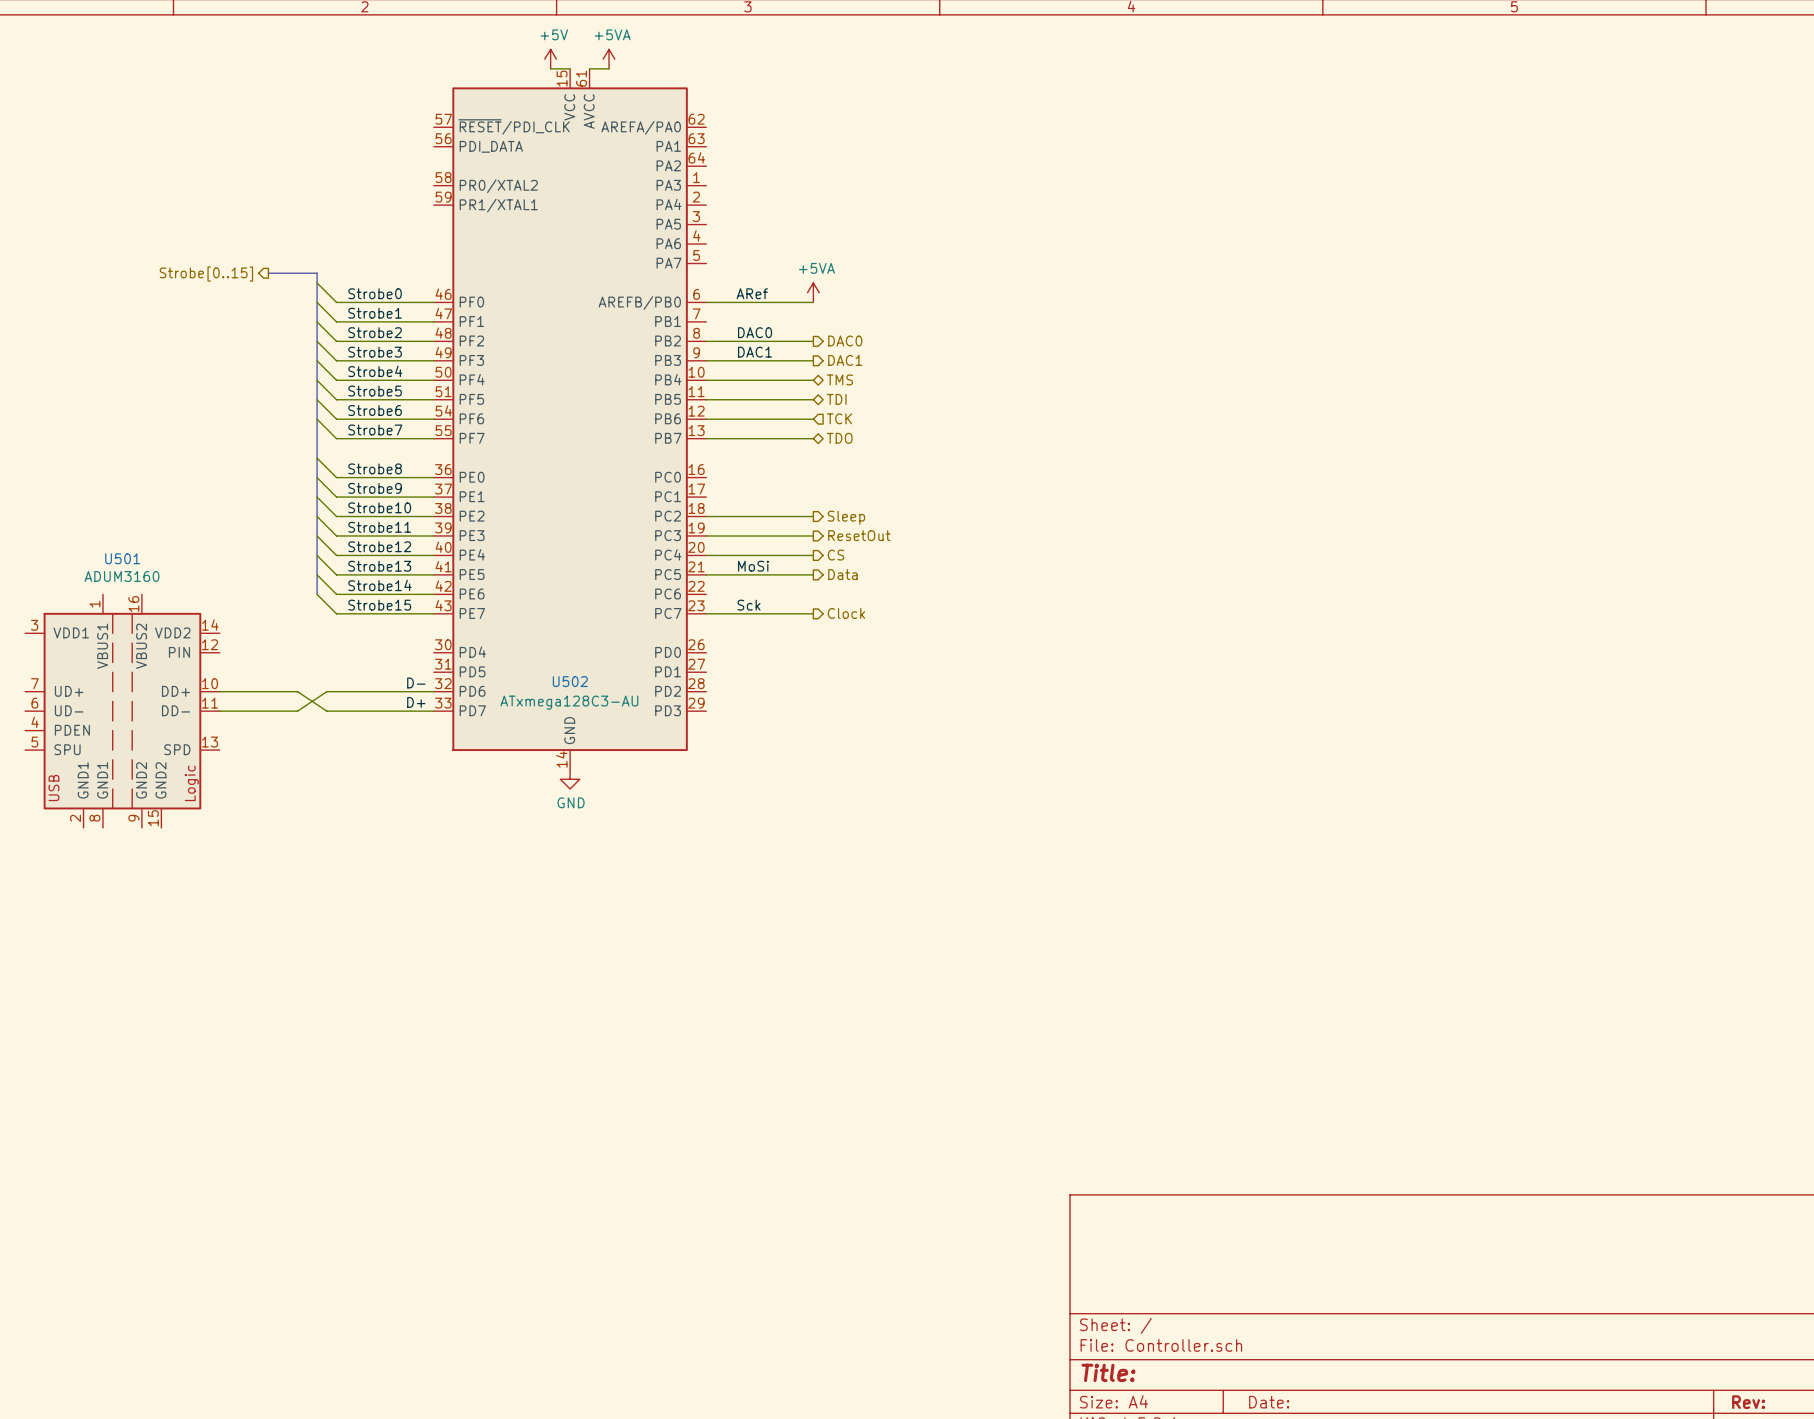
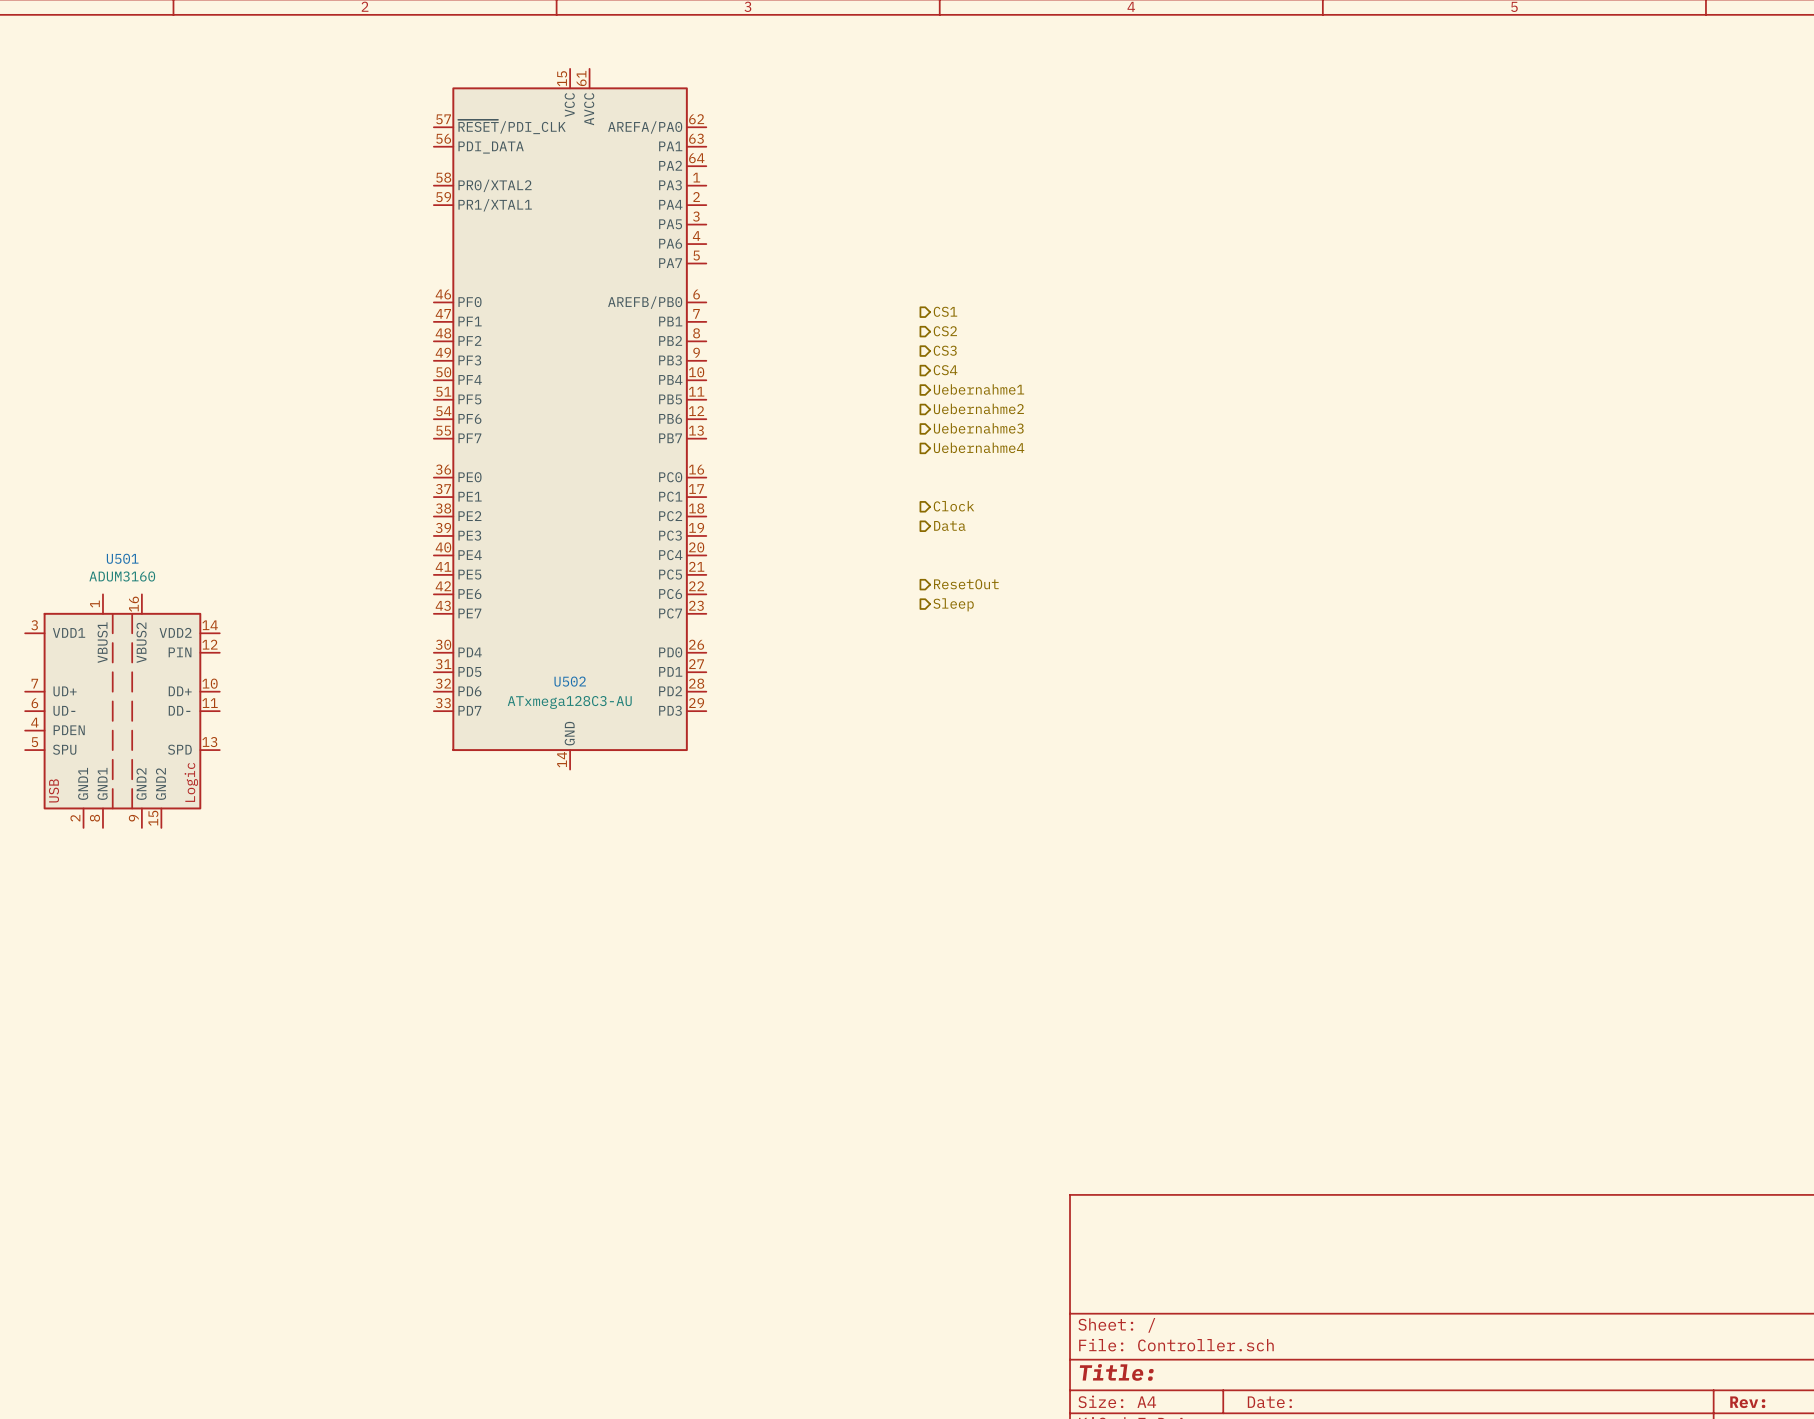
power symbol: +5V (550, 59) -> none
power symbol: +5VA (609, 59) -> none
wire: (550, 68) (570, 68) -> none
wire: (589, 68) (609, 68) -> none
bus: (268, 273) (317, 273) (317, 594) -> none
hierarchical label: Strobe[0..15] (206, 274) -> none
wire: (317, 282) (336, 302) (433, 302) -> none
power symbol: +5VA (813, 292) -> none
label: Strobe0 (375, 293) -> none
label: ARef (752, 293) -> none
wire: (317, 302) (336, 321) (433, 321) -> none
wire: (706, 302) (813, 302) -> none
hierarchical label: none -> CS1 (945, 311)
label: Strobe1 (375, 313) -> none
wire: (317, 321) (336, 341) (433, 341) -> none
hierarchical label: none -> CS2 (945, 331)
label: Strobe2 (375, 332) -> none
label: DAC0 (755, 332) -> none
hierarchical label: DAC0 (845, 340) -> none
wire: (317, 341) (336, 360) (433, 360) -> none
wire: (706, 341) (813, 341) -> none
hierarchical label: none -> CS3 (945, 350)
label: Strobe3 (375, 352) -> none
label: DAC1 (755, 352) -> none
wire: (317, 360) (336, 380) (433, 380) -> none
wire: (706, 360) (813, 360) -> none
hierarchical label: DAC1 (845, 360) -> none
hierarchical label: none -> CS4 (945, 370)
label: Strobe4 (375, 371) -> none
hierarchical label: TMS (839, 379) -> none
wire: (317, 380) (336, 399) (433, 399) -> none
wire: (706, 380) (813, 380) -> none
hierarchical label: none -> Uebernahme1 (979, 389)
label: Strobe5 (375, 391) -> none
wire: (317, 399) (336, 419) (433, 419) -> none
wire: (706, 399) (813, 399) -> none
hierarchical label: TDI (836, 399) -> none
hierarchical label: none -> Uebernahme2 (978, 408)
label: Strobe6 (375, 410) -> none
hierarchical label: TCK (839, 418) -> none
wire: (317, 419) (336, 438) (433, 438) -> none
wire: (706, 419) (813, 419) -> none
hierarchical label: none -> Uebernahme3 (978, 428)
label: Strobe7 (375, 429) -> none
wire: (706, 438) (813, 438) -> none
hierarchical label: TDO (839, 438) -> none
hierarchical label: none -> Uebernahme4 (979, 447)
wire: (317, 458) (336, 477) (433, 477) -> none
label: Strobe8 (375, 468) -> none
wire: (317, 477) (336, 497) (433, 497) -> none
label: Strobe9 (375, 488) -> none
wire: (317, 497) (336, 516) (433, 516) -> none
label: Strobe10 (379, 507) -> none
wire: (317, 516) (336, 535) (433, 535) -> none
wire: (706, 516) (813, 516) -> none
hierarchical label position: Sleep (846, 517) -> Sleep (953, 604)
label: Strobe11 (379, 527) -> none
wire: (317, 535) (336, 555) (433, 555) -> none
wire: (706, 535) (813, 535) -> none
hierarchical label position: ResetOut (859, 535) -> ResetOut (966, 584)
label: Strobe12 (379, 546) -> none
wire: (317, 555) (336, 574) (433, 574) -> none
wire: (706, 555) (813, 555) -> none
hierarchical label: CS (836, 555) -> none
label: Strobe13 (379, 566) -> none
label: MoSi (753, 566) -> none
wire: (317, 574) (336, 594) (433, 594) -> none
wire: (706, 574) (813, 574) -> none
hierarchical label position: Data (842, 574) -> Data (949, 525)
label: Strobe14 (379, 585) -> none
wire: (317, 594) (336, 613) (433, 613) -> none
label: Strobe15 (379, 605) -> none
label: Sck (749, 605) -> none
wire: (706, 613) (813, 613) -> none
hierarchical label position: Clock (846, 613) -> Clock (954, 506)
label: D- (416, 683) -> none
wire: (219, 691) (297, 691) (326, 711) (433, 711) -> none
wire: (433, 691) (326, 691) (297, 711) (219, 711) -> none
label: D+ (416, 702) -> none
power symbol: GND (570, 779) -> none

